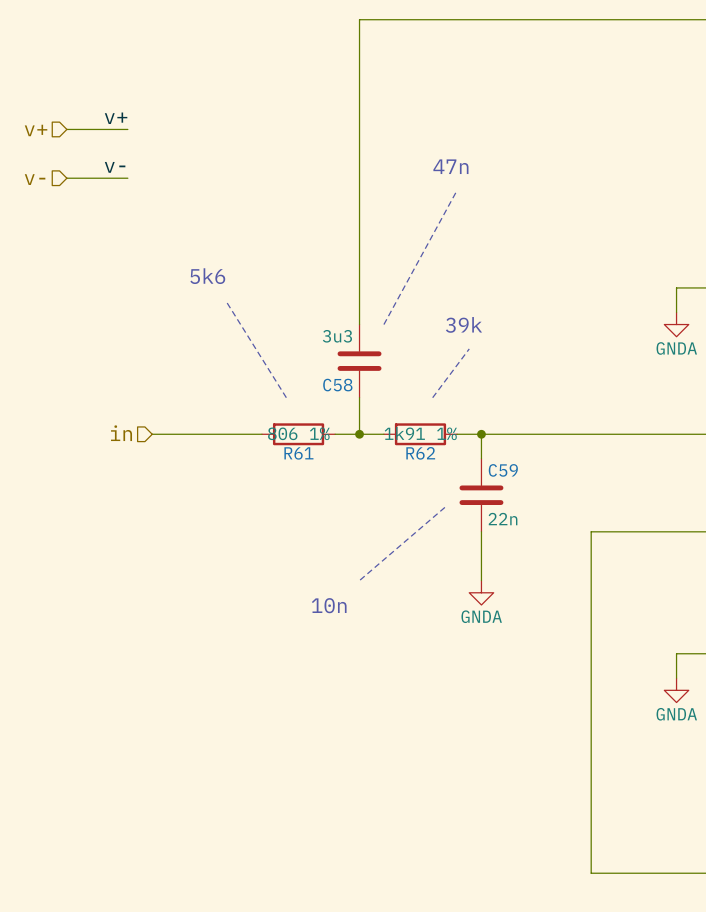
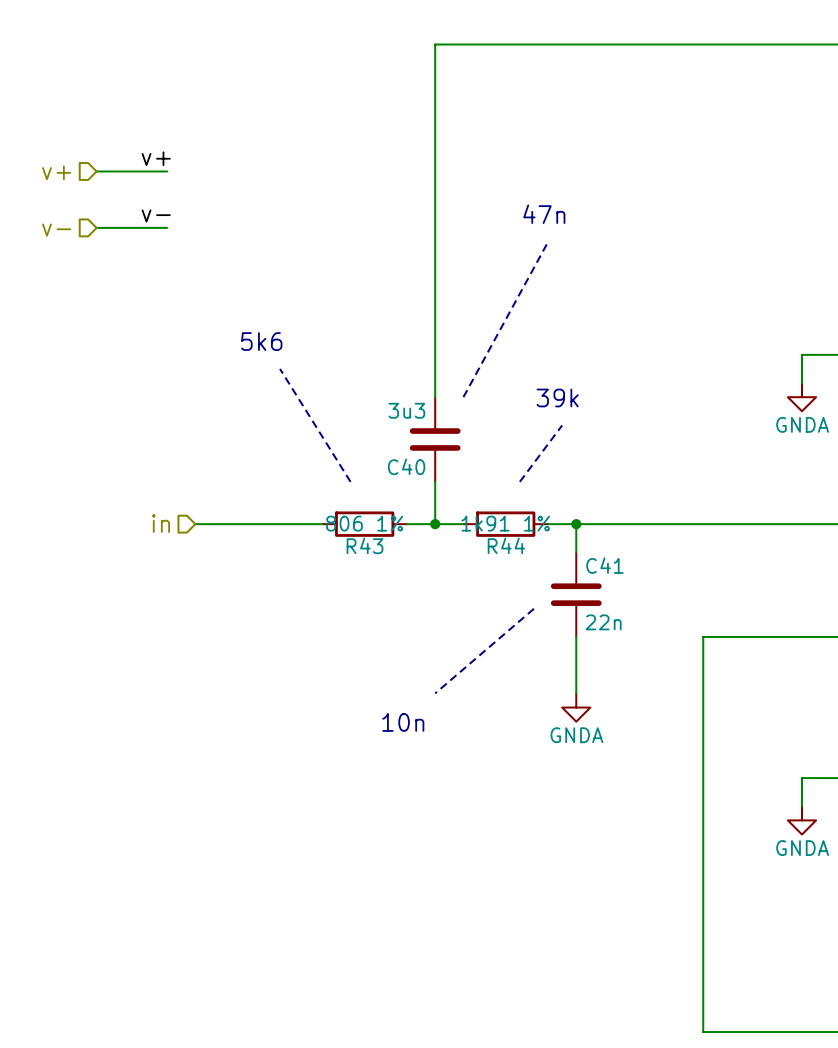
C58 name: C58 (337, 385) -> C40 (406, 466)
R61 name: R61 (298, 453) -> R43 (365, 545)
R62 name: R62 (420, 453) -> R44 (506, 545)
C59 name: C59 (503, 470) -> C41 (604, 565)

